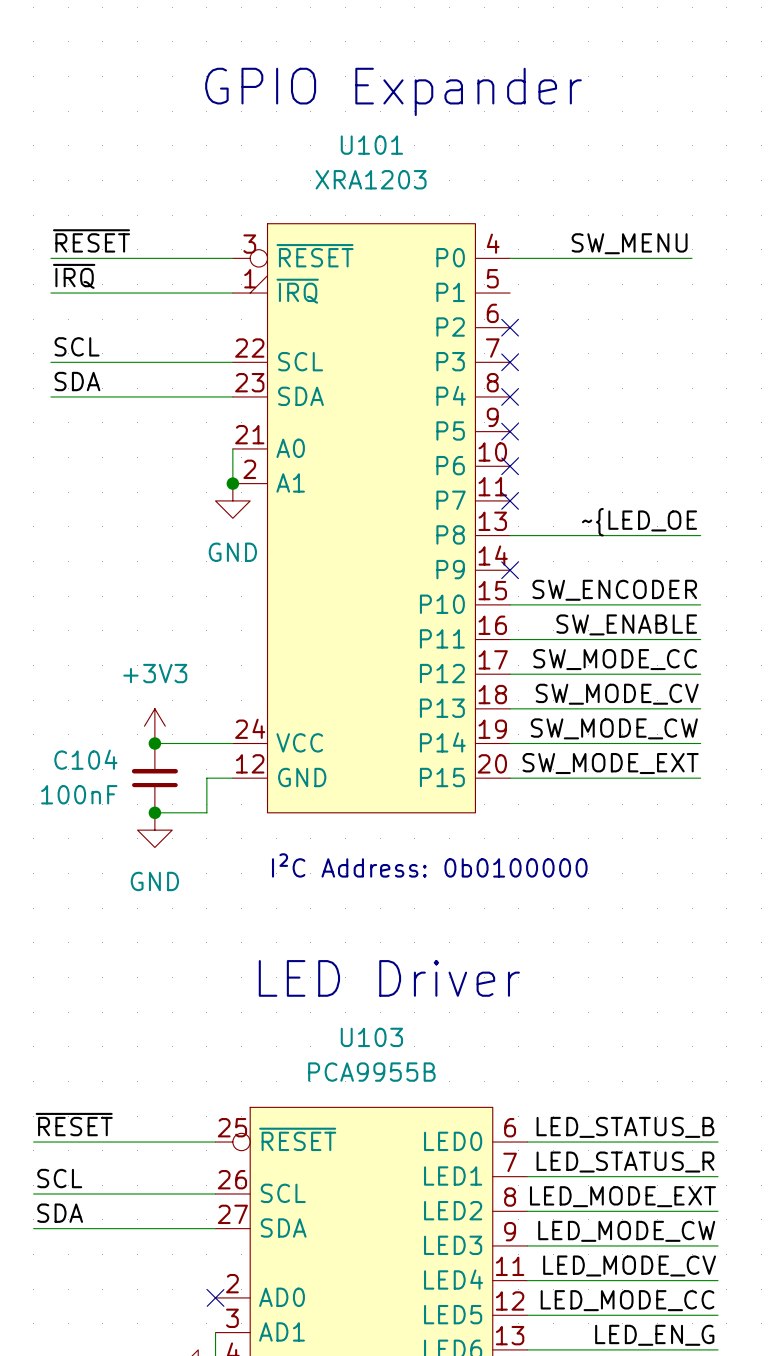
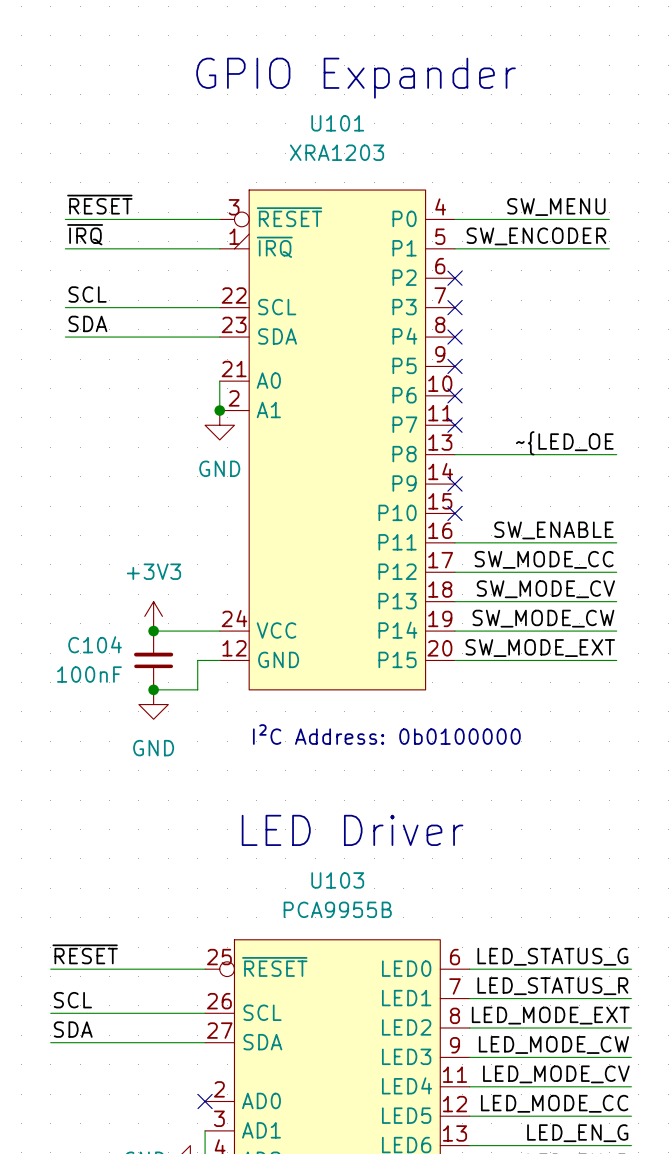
wire: none -> (454, 248) (609, 248)
label position: SW_ENCODER (614, 590) -> SW_ENCODER (536, 236)
wire: (510, 604) (700, 604) -> none
no-connect mark: none -> (454, 513)
label: LED_STATUS_B (625, 1127) -> LED_STATUS_G (552, 956)

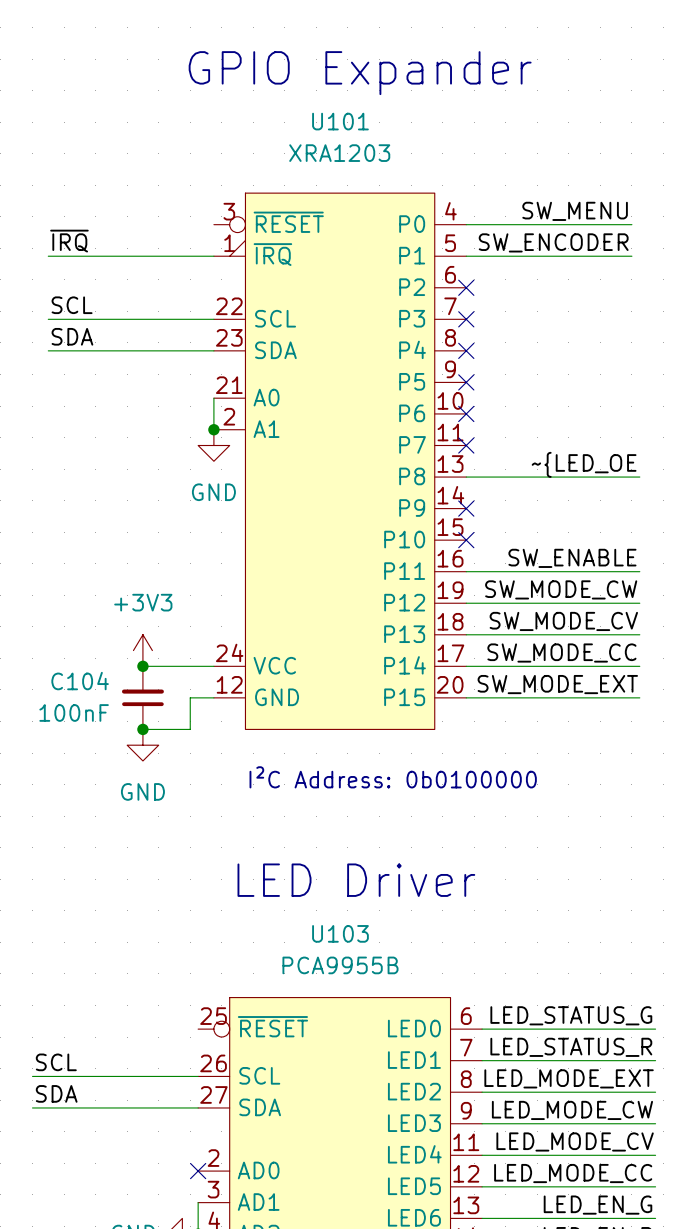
label: ~{RESET} (99, 204) -> none
wire: (65, 219) (219, 219) -> none
label: SW_MODE_CC (544, 559) -> SW_MODE_CW (561, 589)
U101 pin number: 17 (440, 560) -> 19 (450, 590)
U101 pin number: 19 (440, 618) -> 17 (450, 653)
label: SW_MODE_CW (543, 618) -> SW_MODE_CC (561, 653)
label: ~{RESET} (85, 954) -> none
wire: (50, 969) (205, 969) -> none

